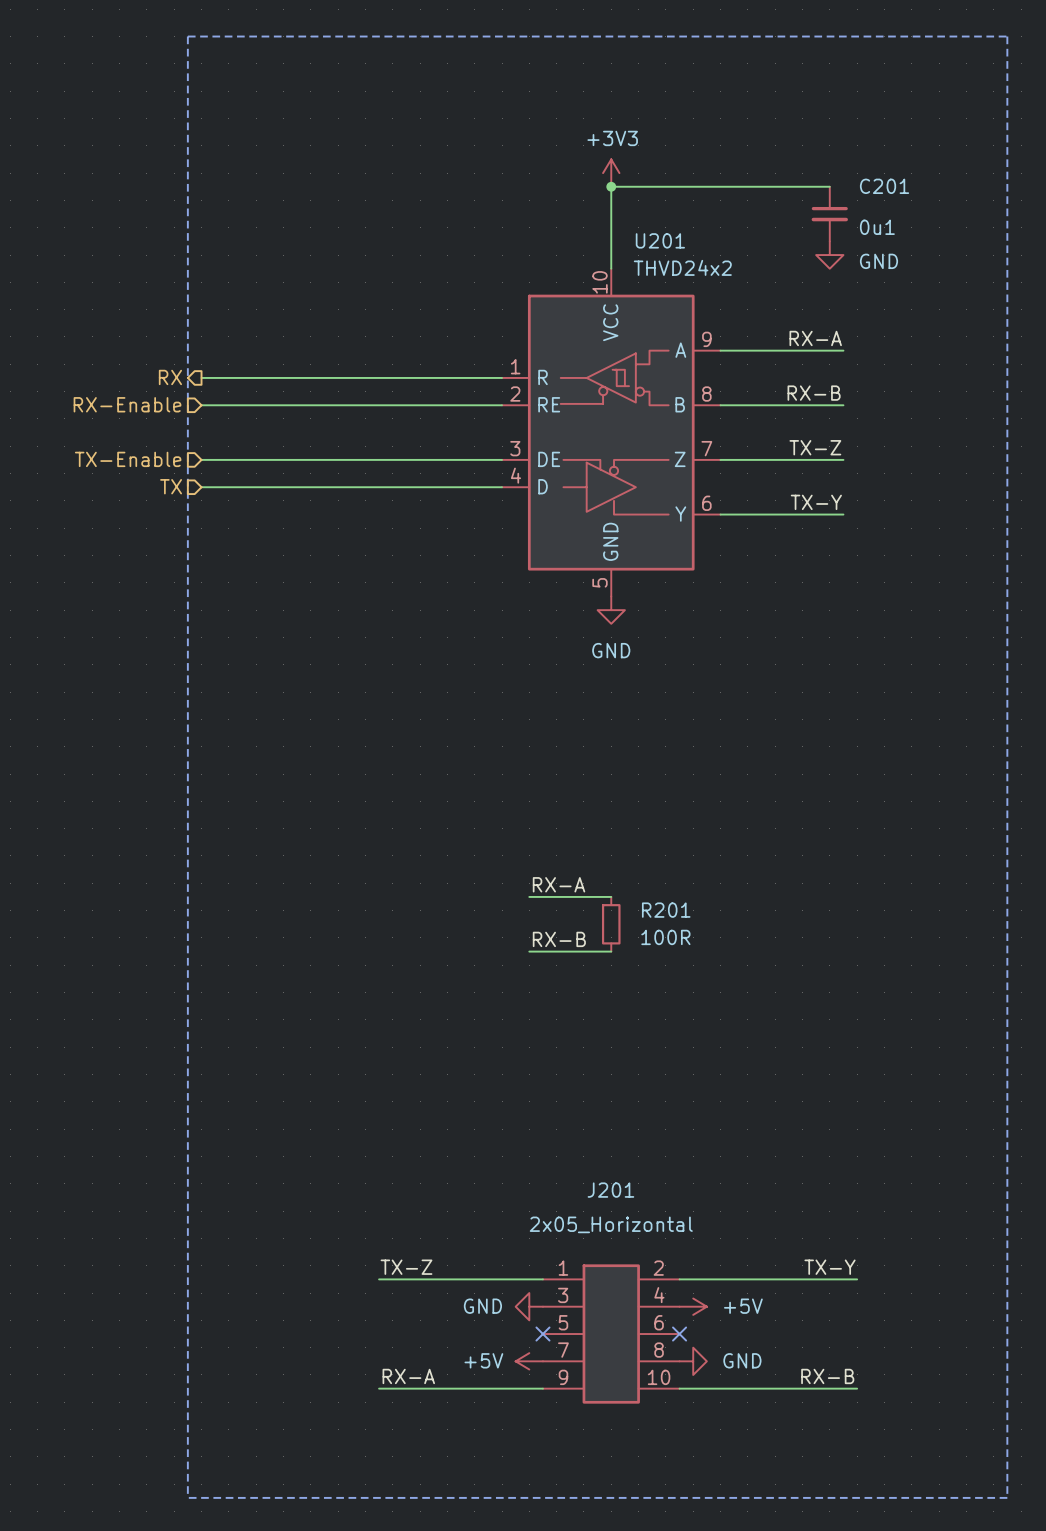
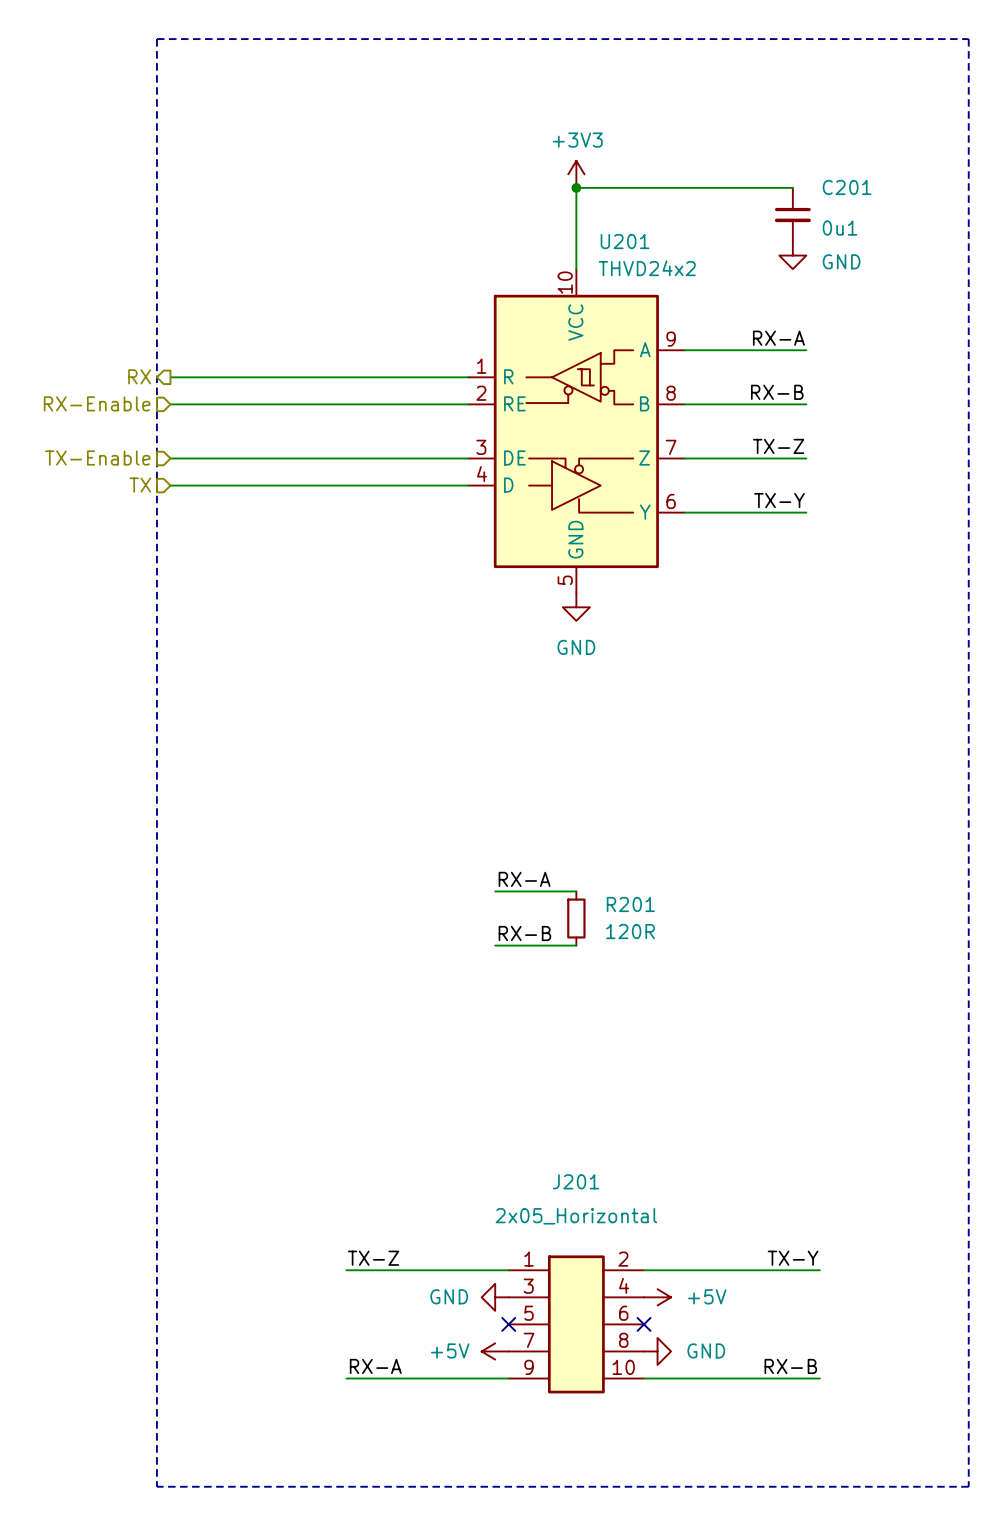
R201 value: 100R (665, 937) -> 120R (630, 931)

